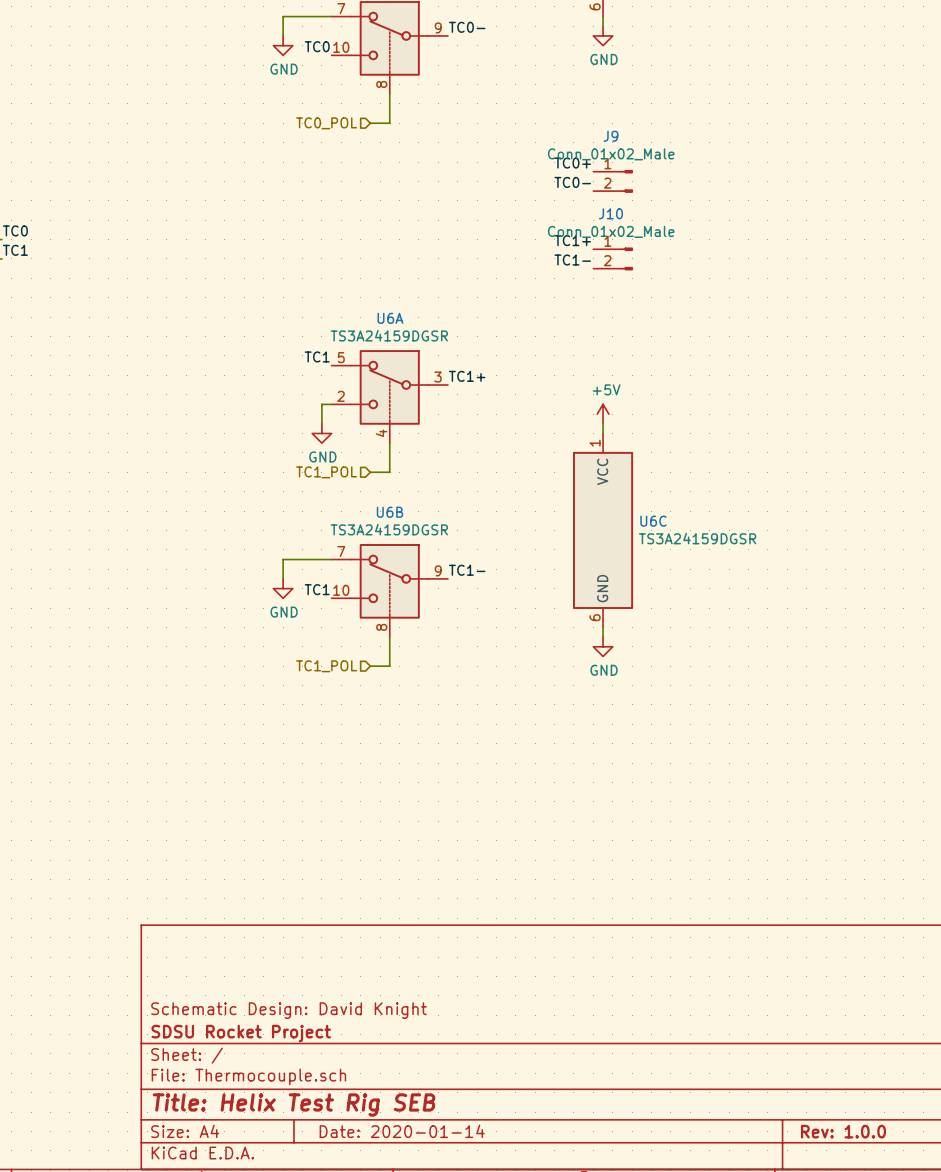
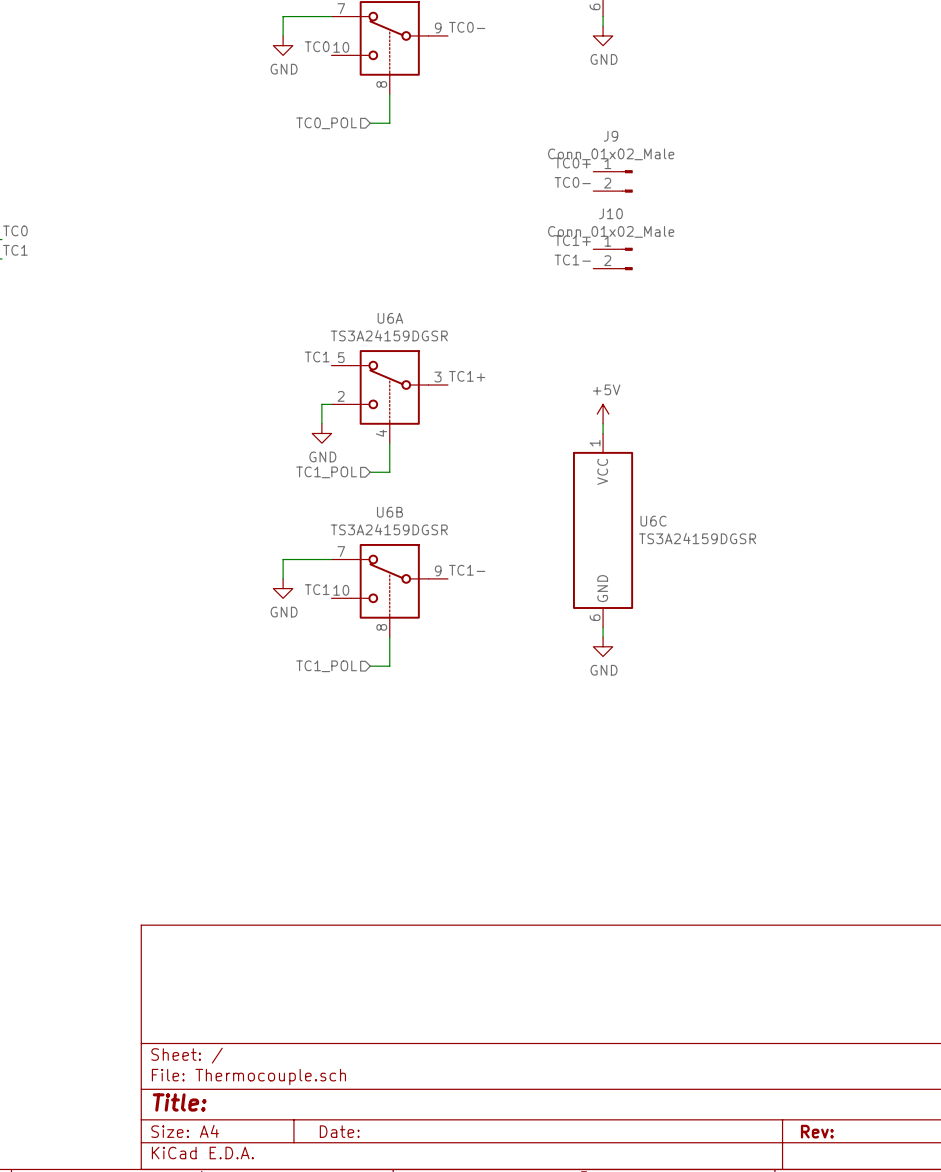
title block: Schematic Design: David Knight (289, 1010) -> none
title block: SDSU Rocket Project (241, 1033) -> none
title block: Title: Helix Test Rig SEB (294, 1105) -> Title: (179, 1102)
title block: Date: 2020-01-14 (402, 1131) -> Date: (339, 1131)
title block: Rev: 1.0.0 (843, 1131) -> Rev: (817, 1131)

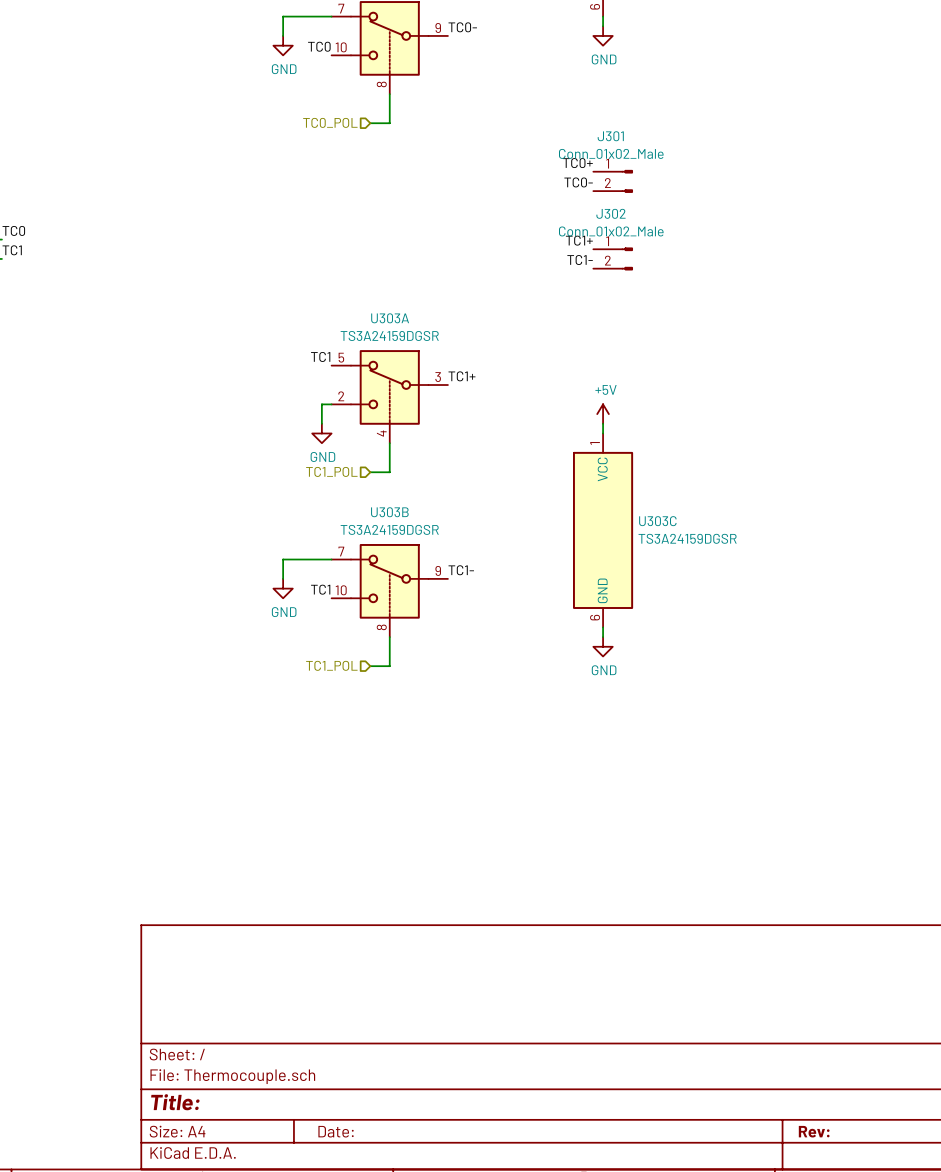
J9 name: J9 (610, 136) -> J301 (610, 136)
J10 name: J10 (610, 213) -> J302 (611, 213)
U6A name: U6A (390, 318) -> U303A (390, 318)
U6B name: U6B (389, 512) -> U303B (389, 512)
U6C name: U6C (653, 521) -> U303C (657, 521)

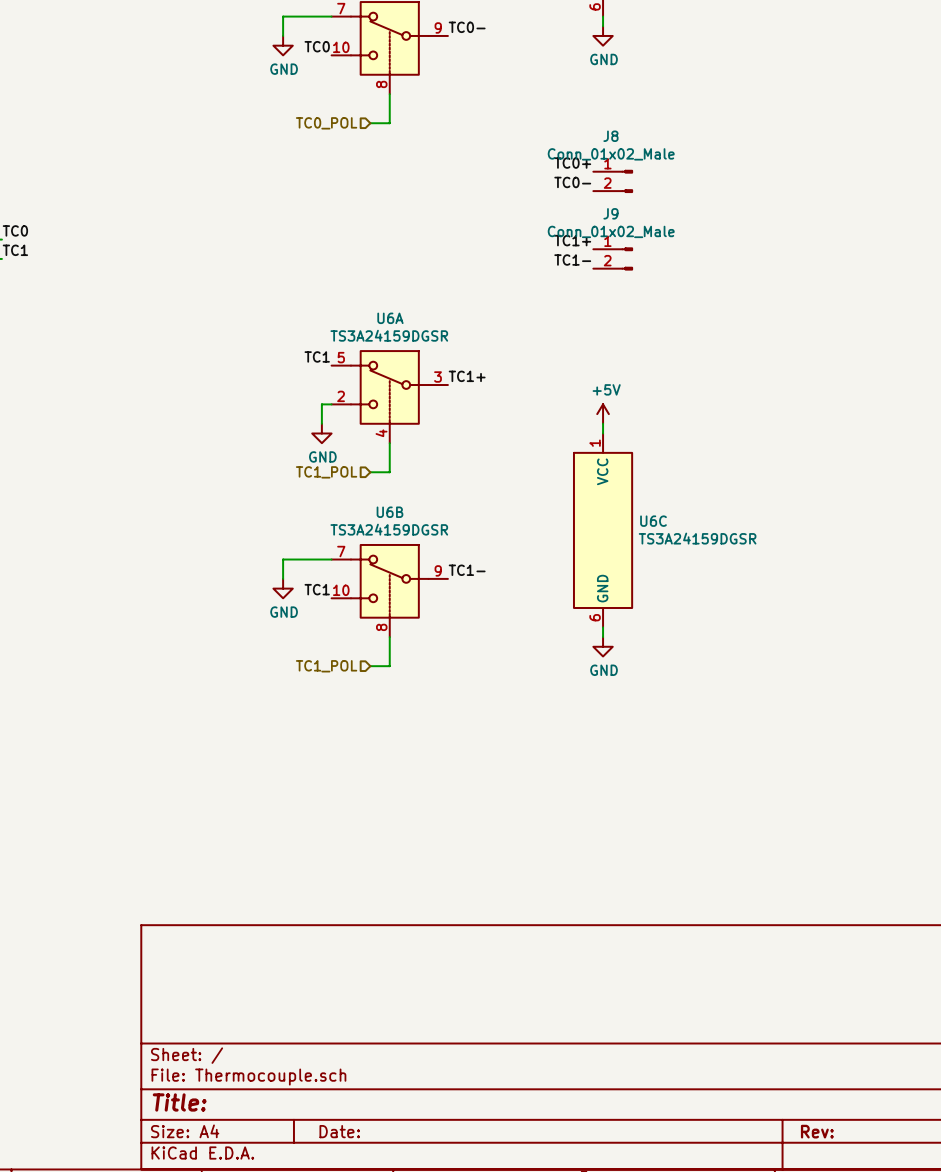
J301 name: J301 (610, 136) -> J8 (610, 136)
J302 name: J302 (611, 213) -> J9 (610, 213)
U303A name: U303A (390, 318) -> U6A (390, 318)
U303B name: U303B (389, 512) -> U6B (389, 512)
U303C name: U303C (657, 521) -> U6C (653, 521)

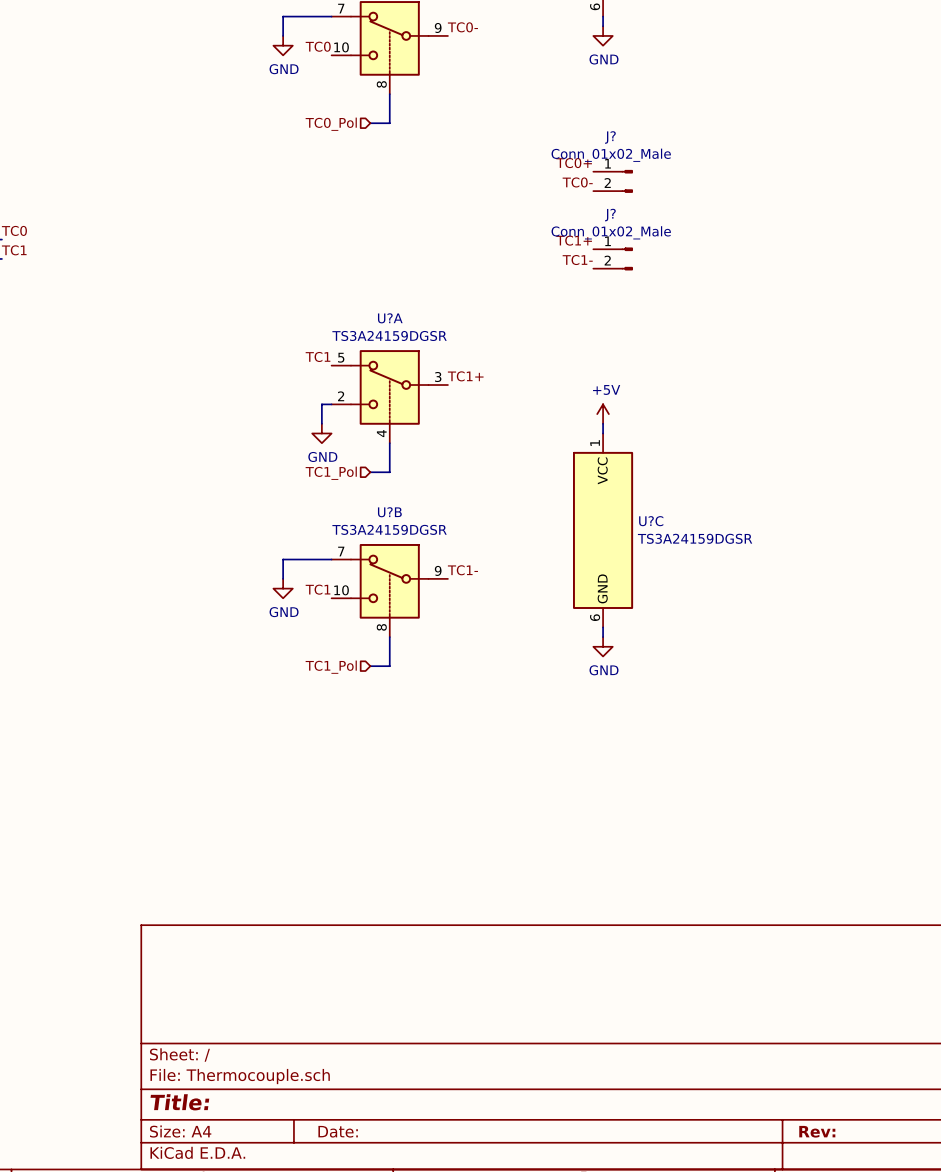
hierarchical label: TC0_POL (326, 123) -> TC0_Pol (331, 124)
J8 name: J8 (610, 136) -> J? (610, 137)
J9 name: J9 (610, 213) -> J? (610, 215)
U6A name: U6A (390, 318) -> U?A (390, 318)
hierarchical label: TC1_POL (326, 472) -> TC1_Pol (331, 473)
U6B name: U6B (389, 512) -> U?B (389, 512)
U6C name: U6C (653, 521) -> U?C (651, 521)
hierarchical label: TC1_POL (326, 666) -> TC1_Pol (331, 667)

